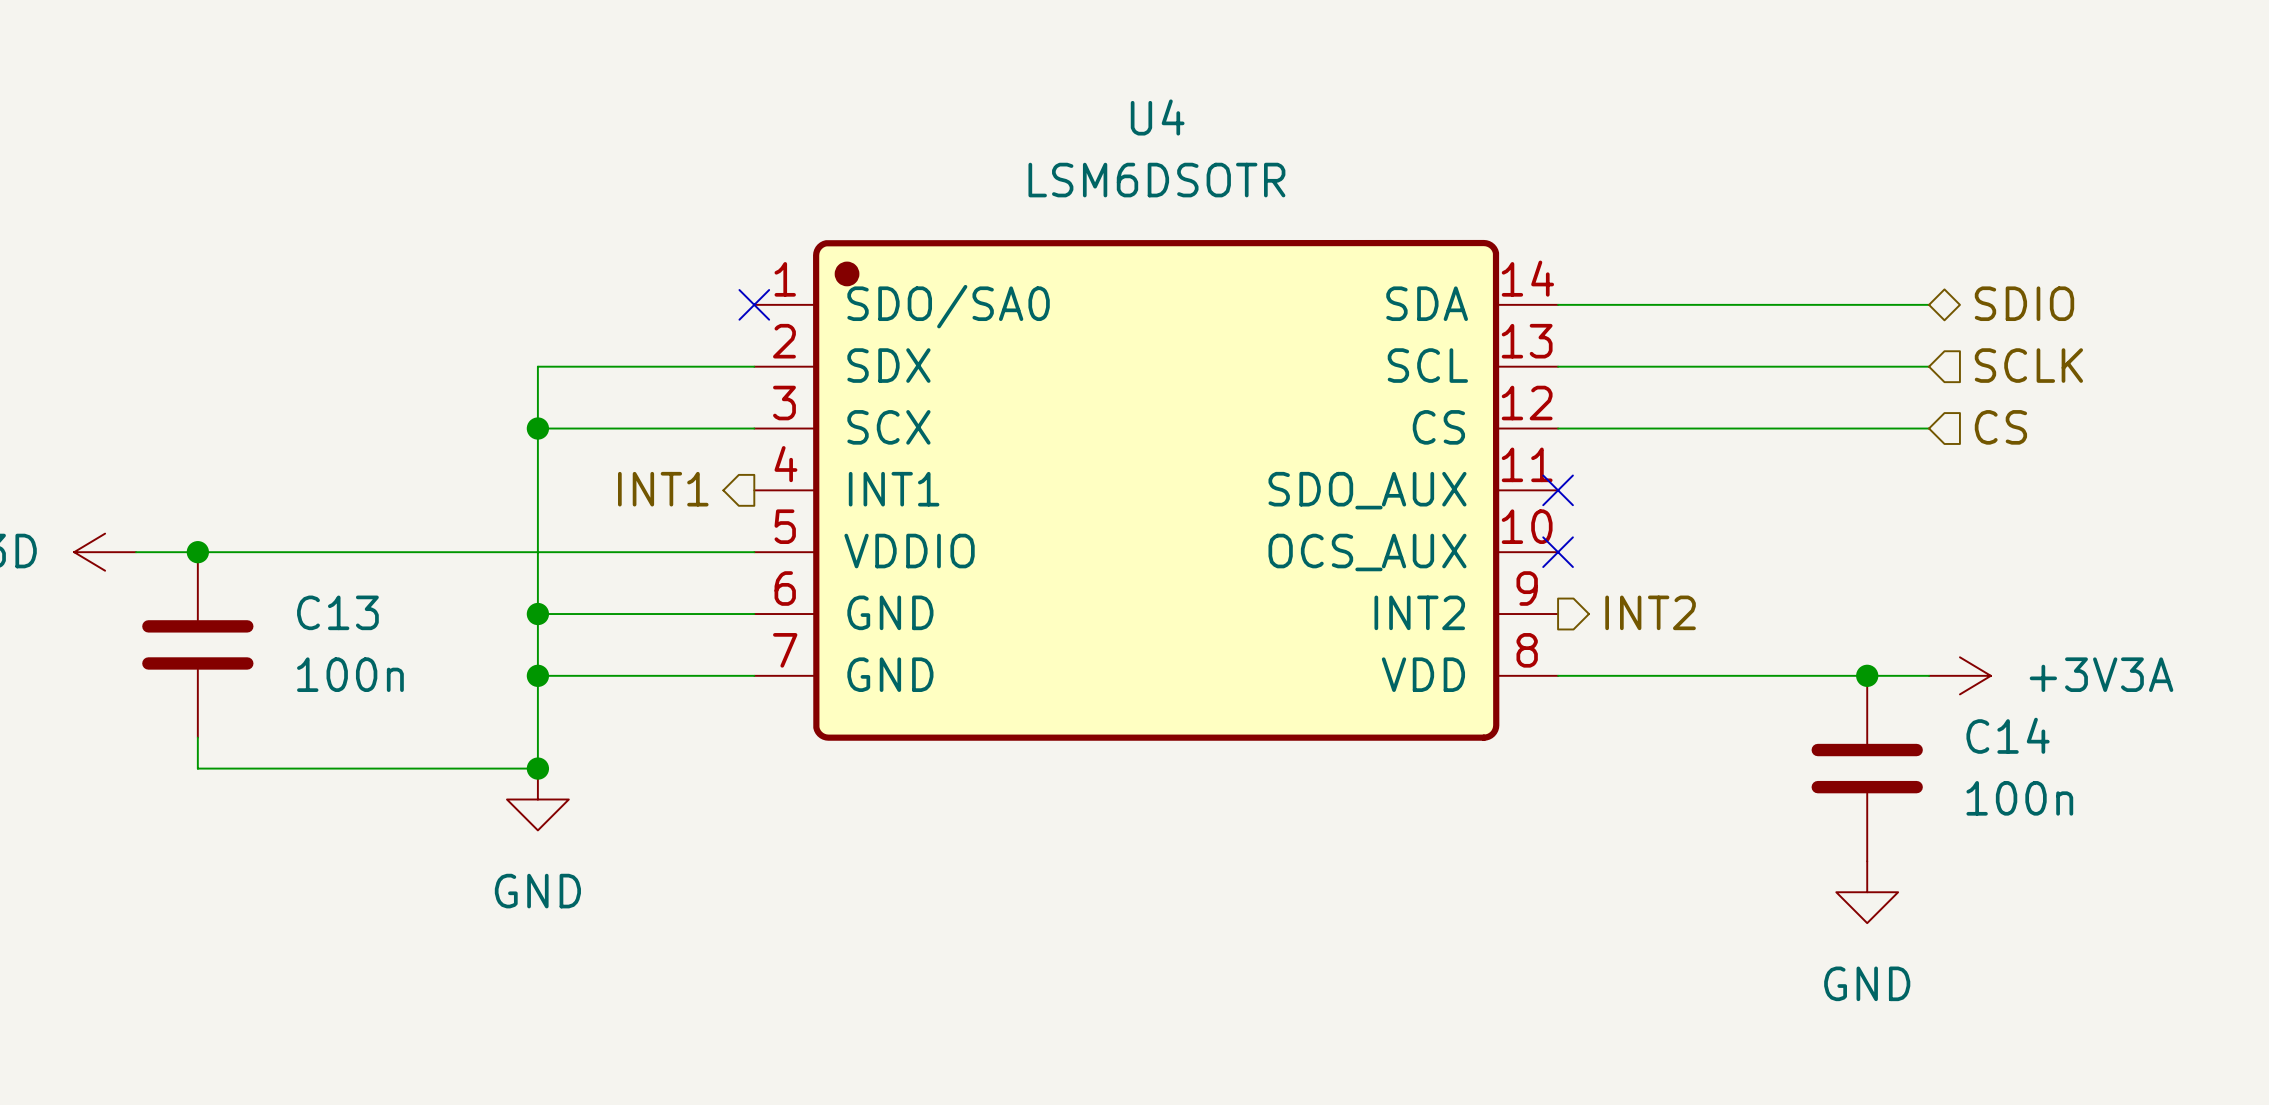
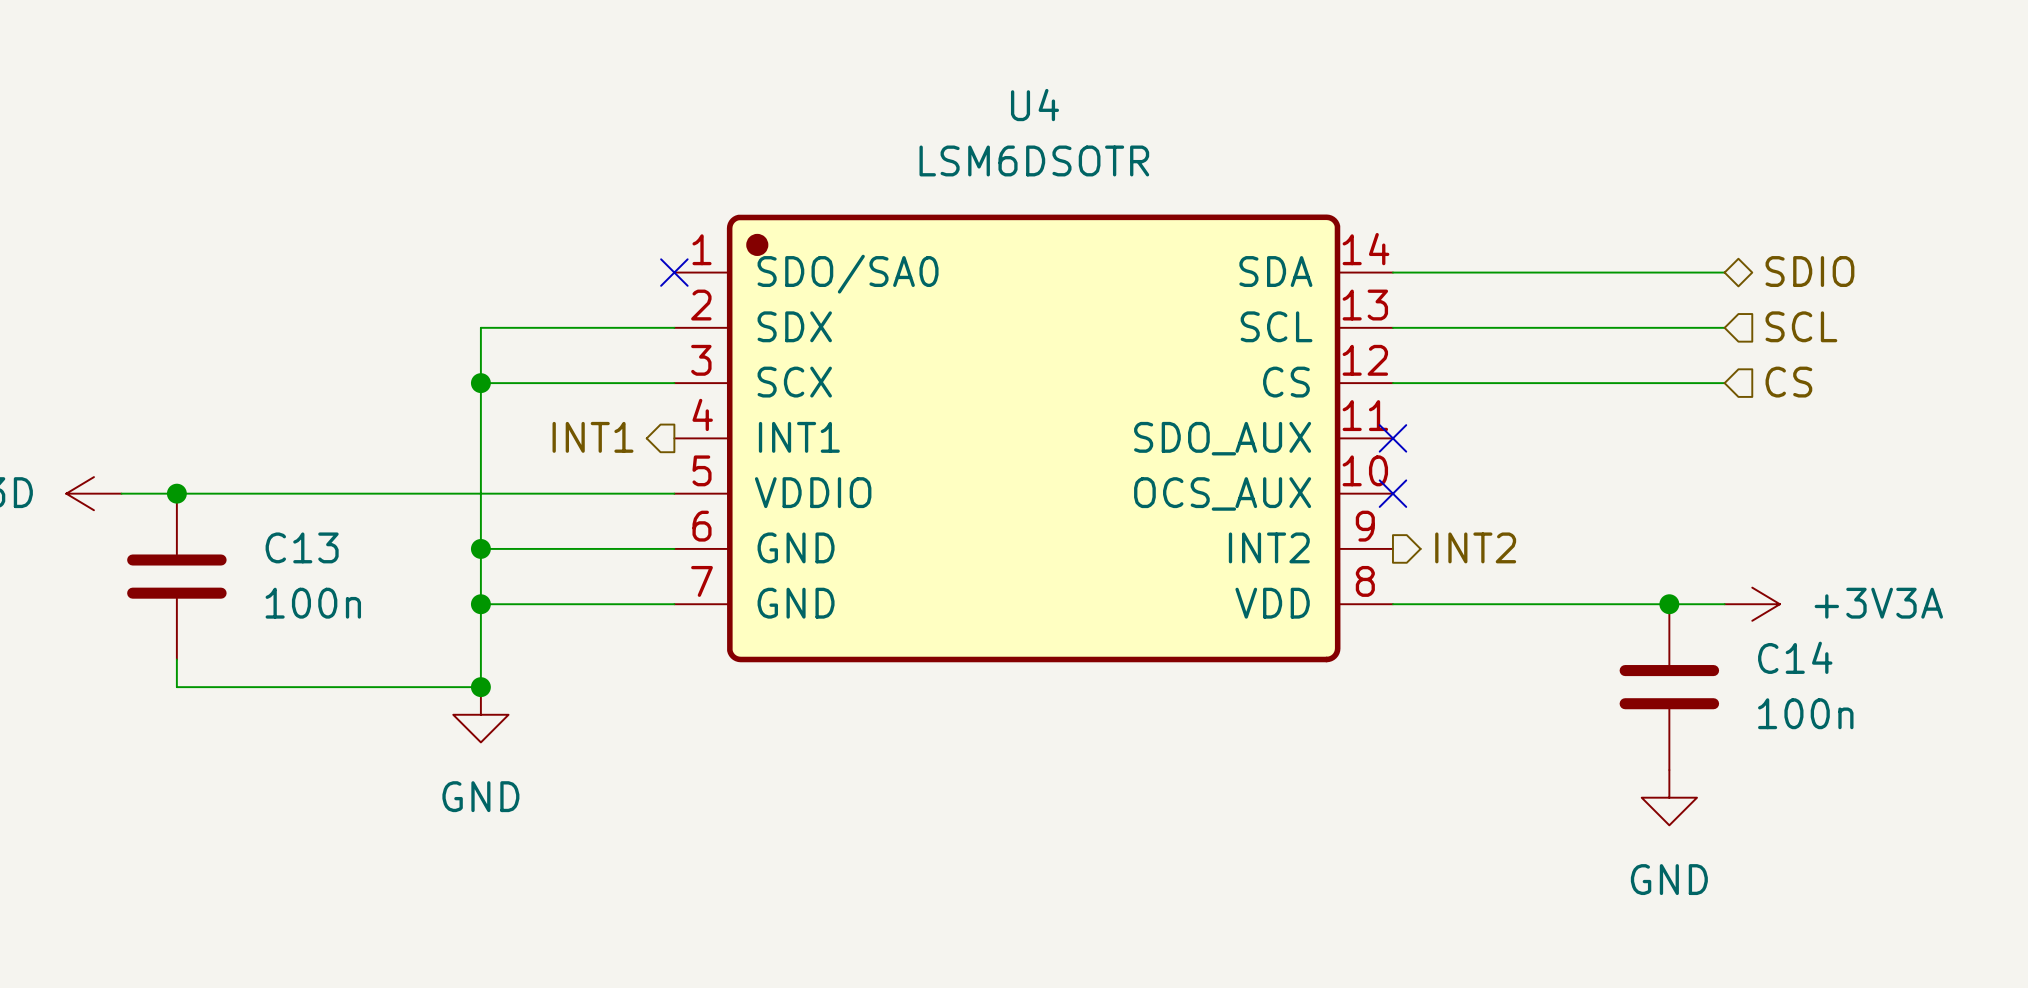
hierarchical label: SCLK (2028, 365) -> SCL (1801, 326)

